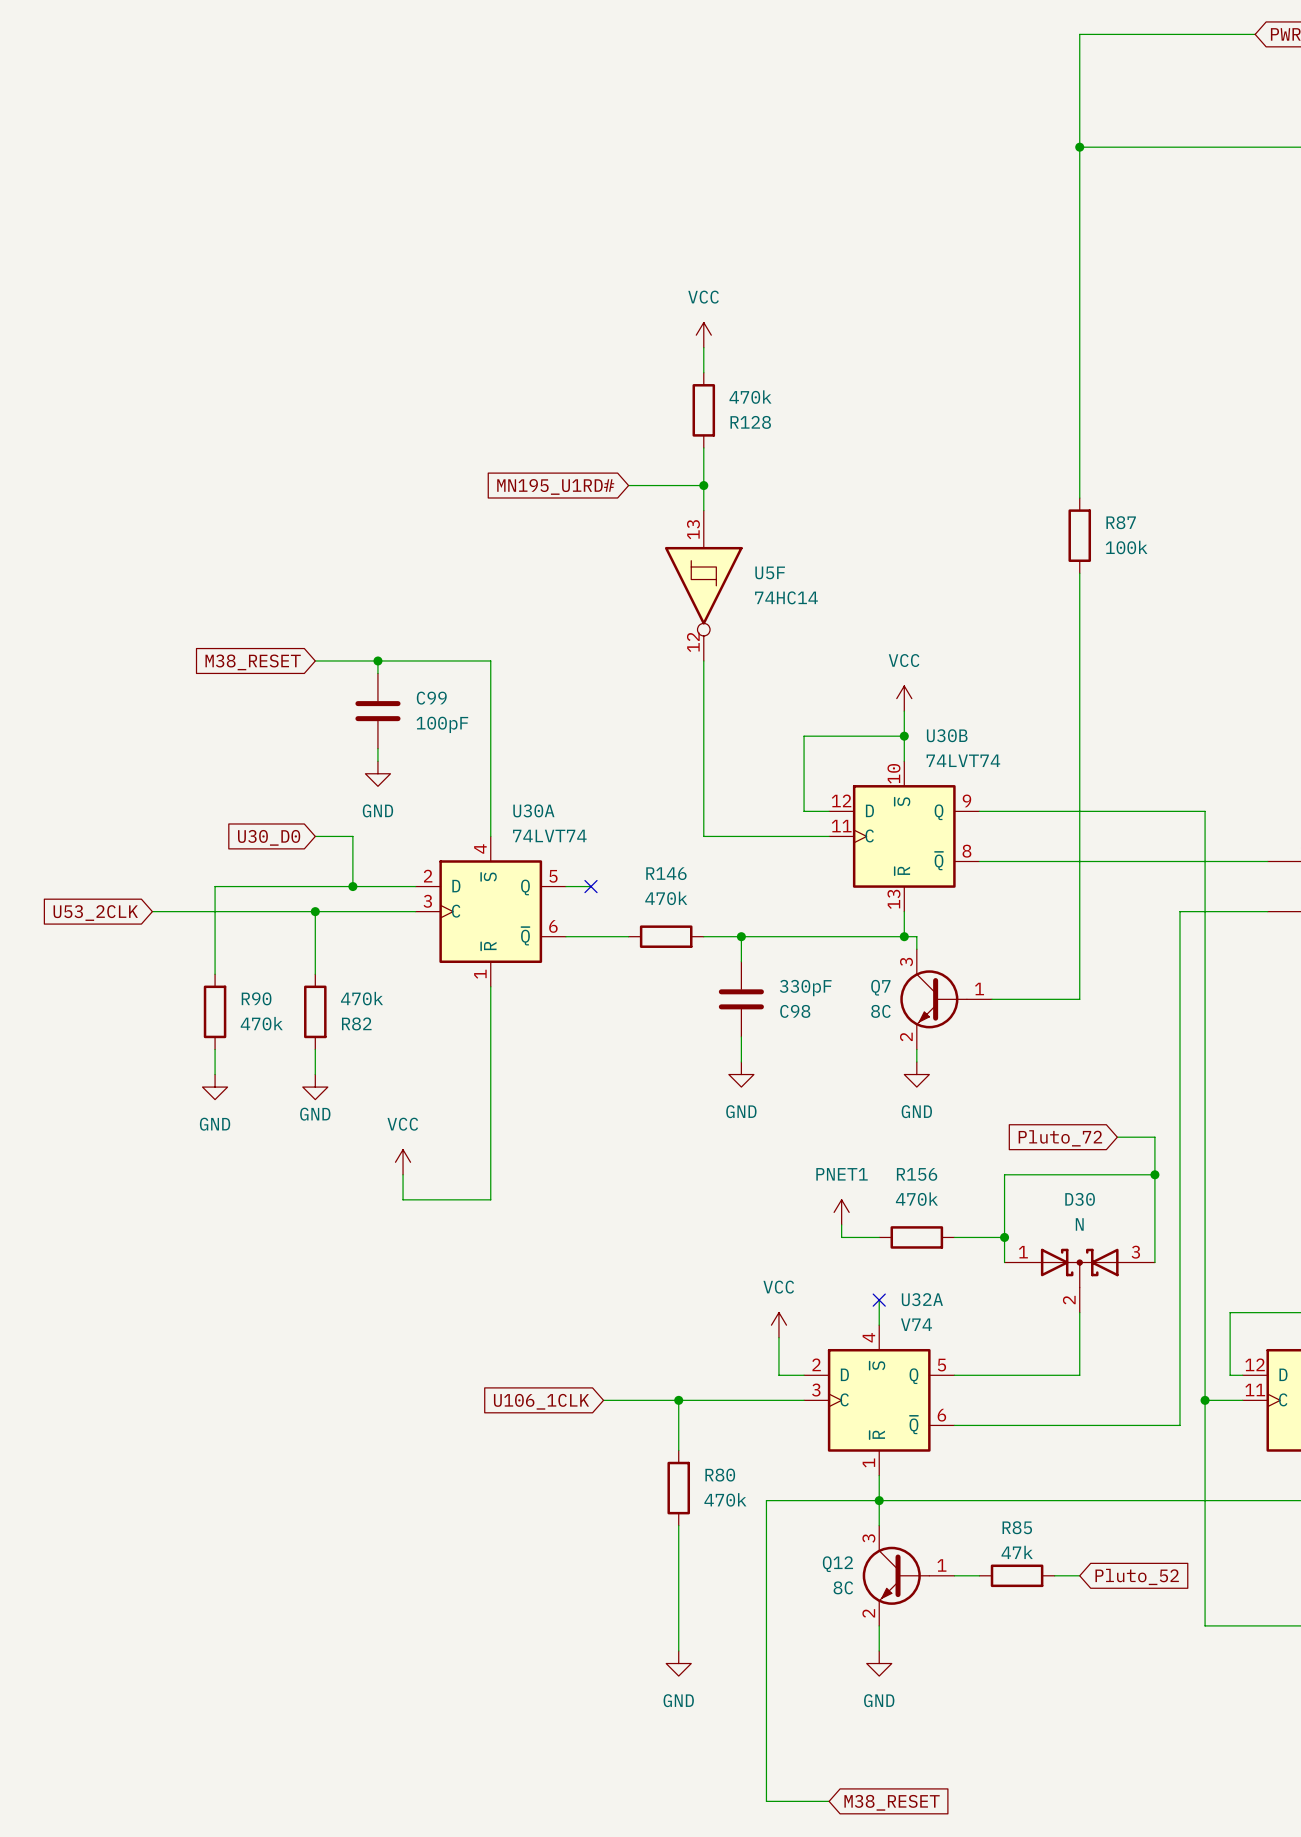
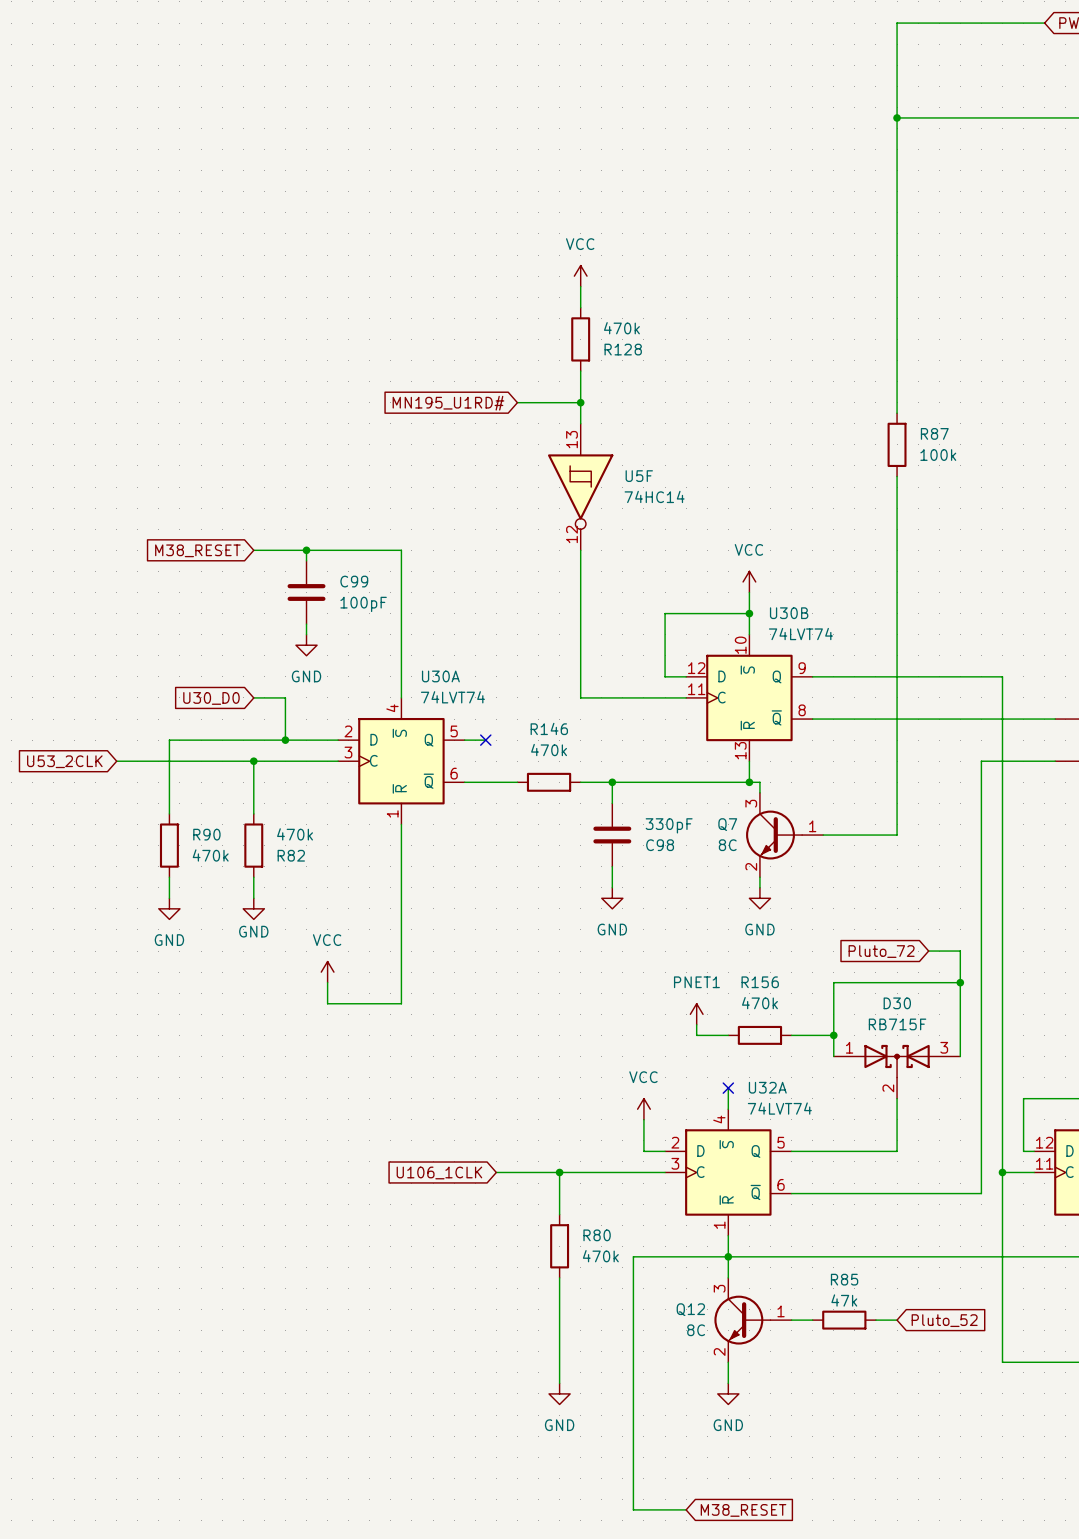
D30 value: N (1079, 1224) -> RB715F (897, 1024)
U32A value: V74 (916, 1324) -> 74LVT74 (779, 1108)

